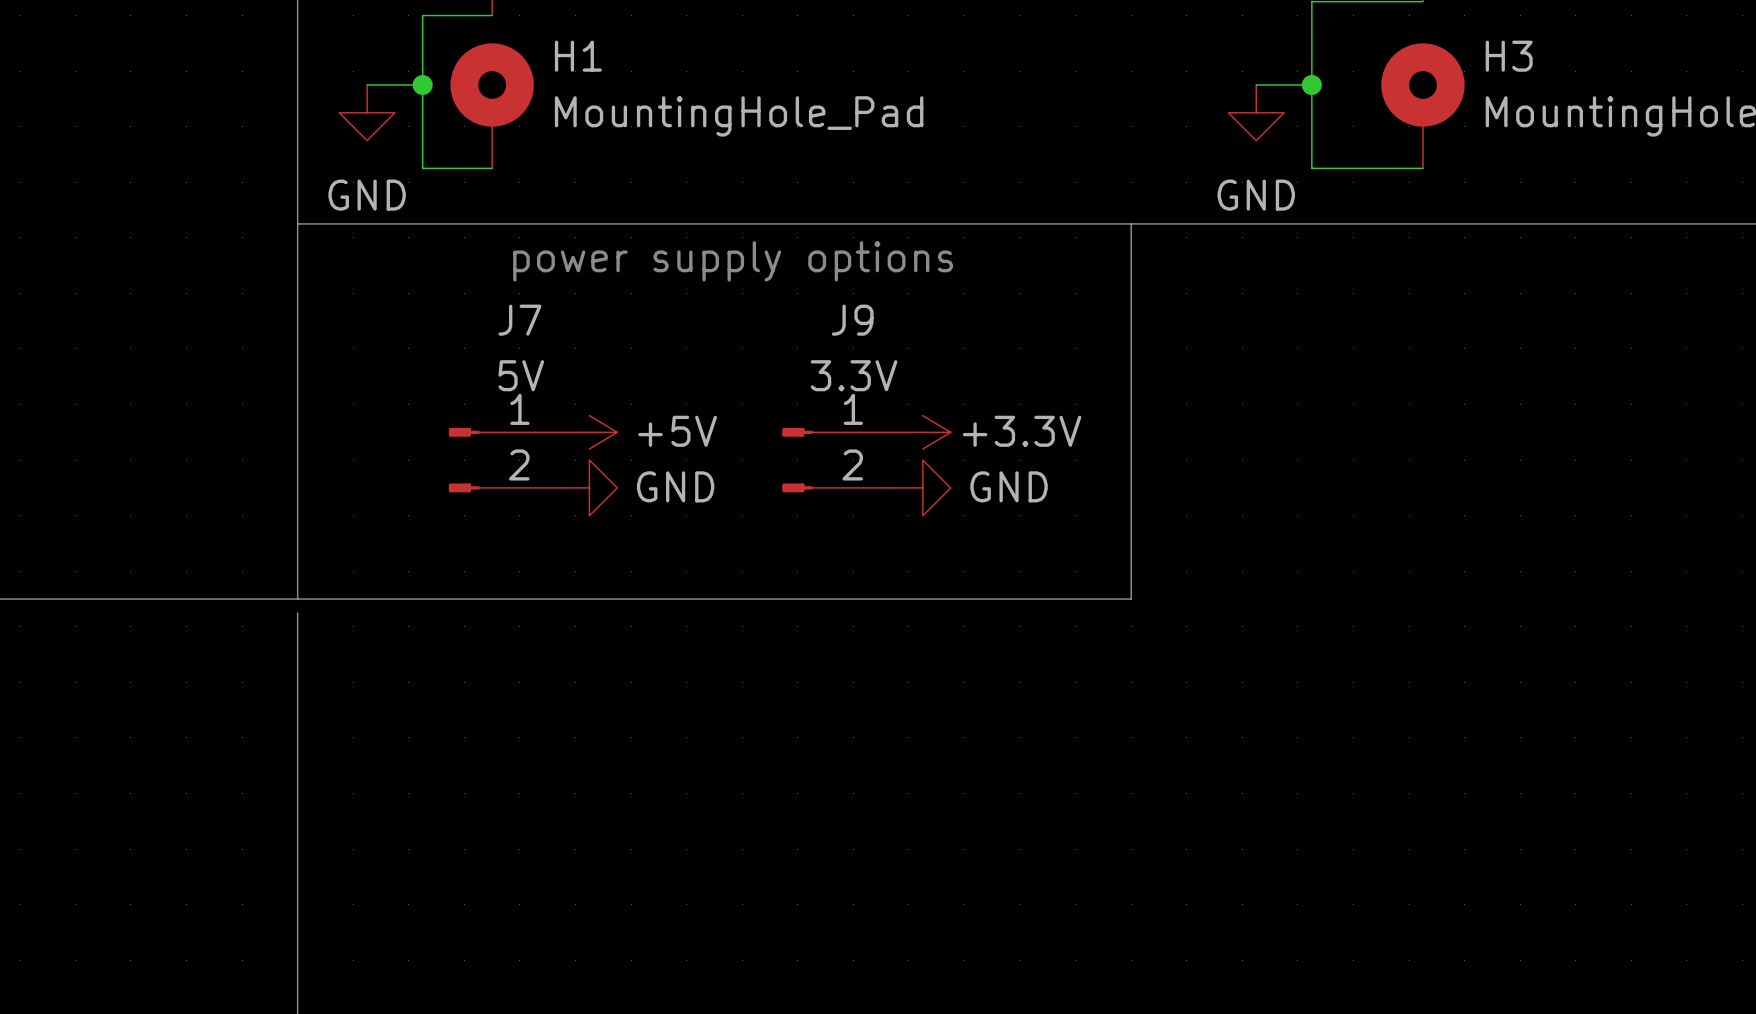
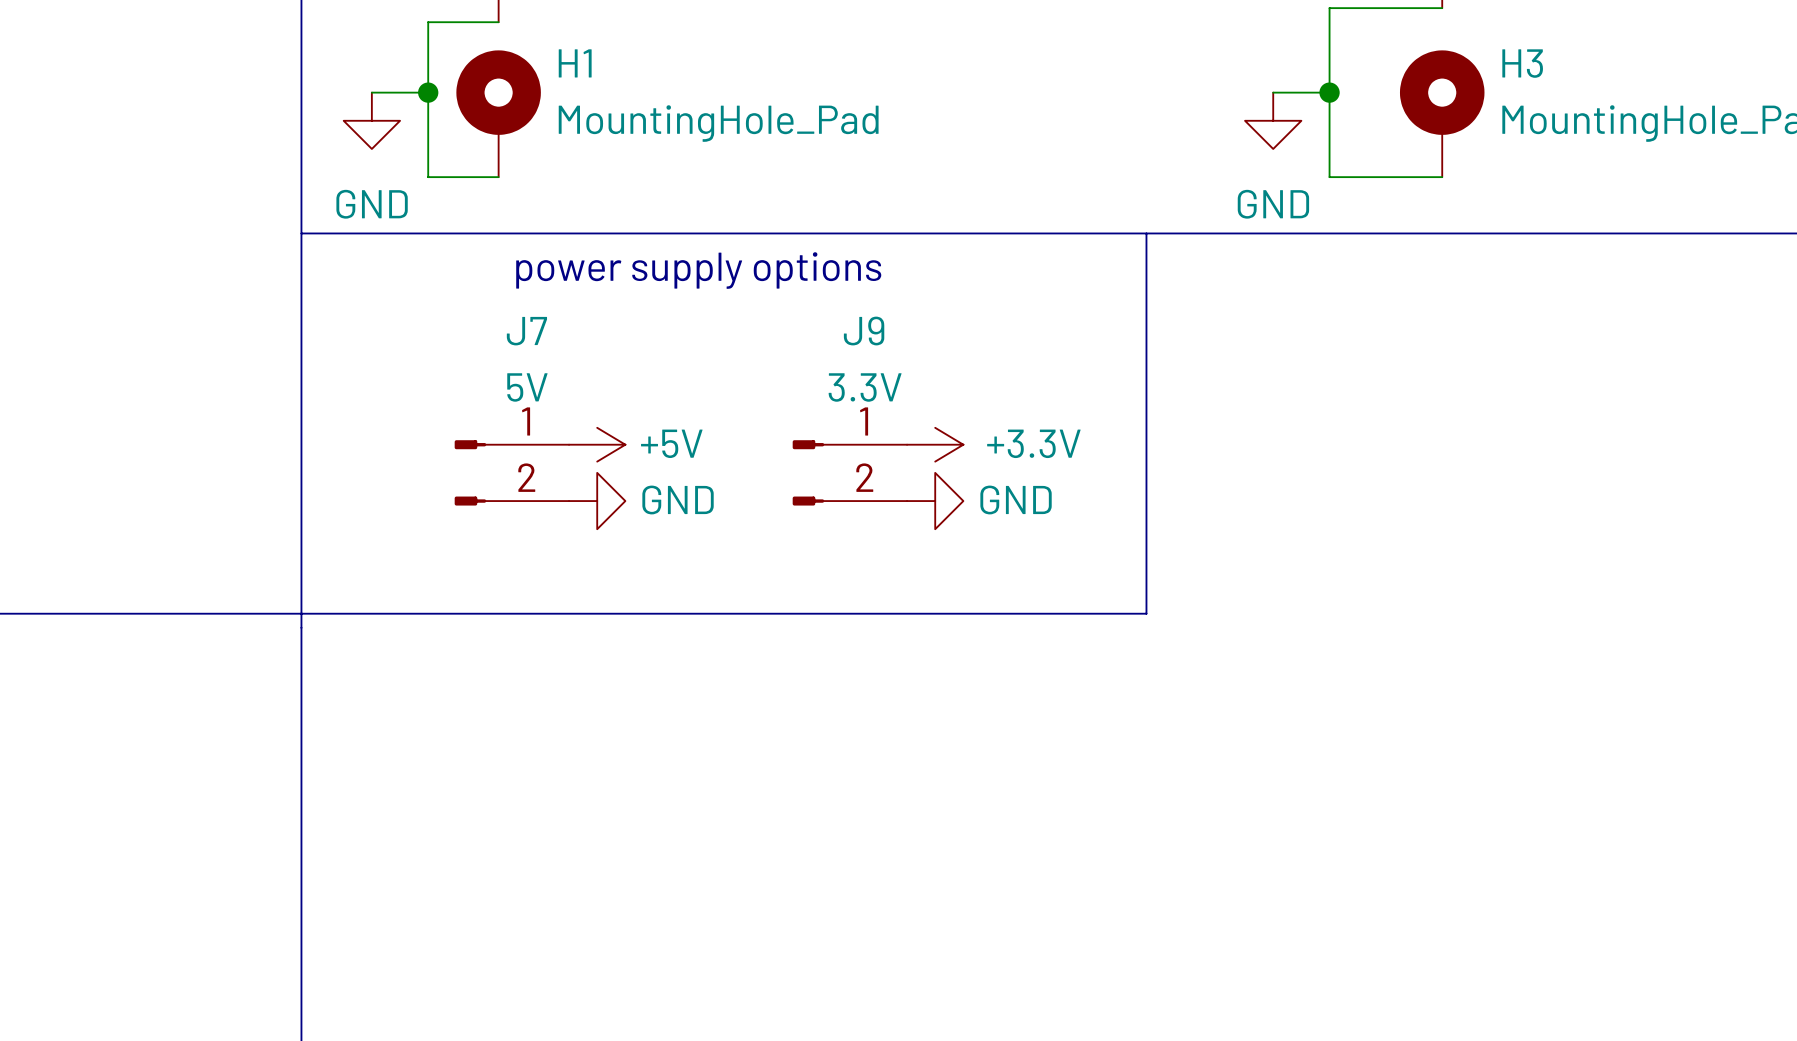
line: none -> (301, 613) (301, 627)

